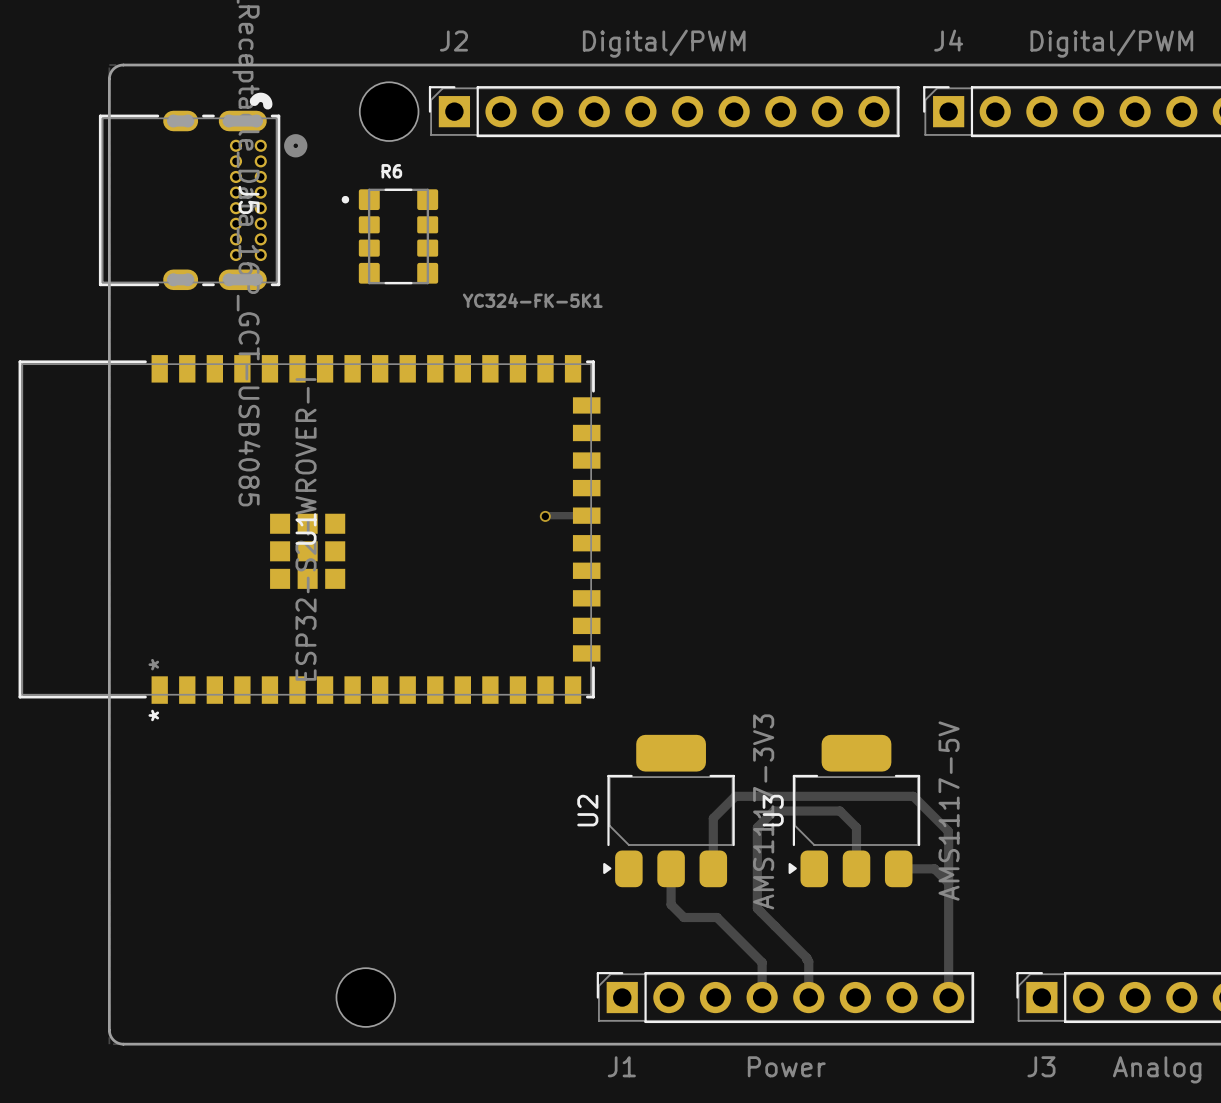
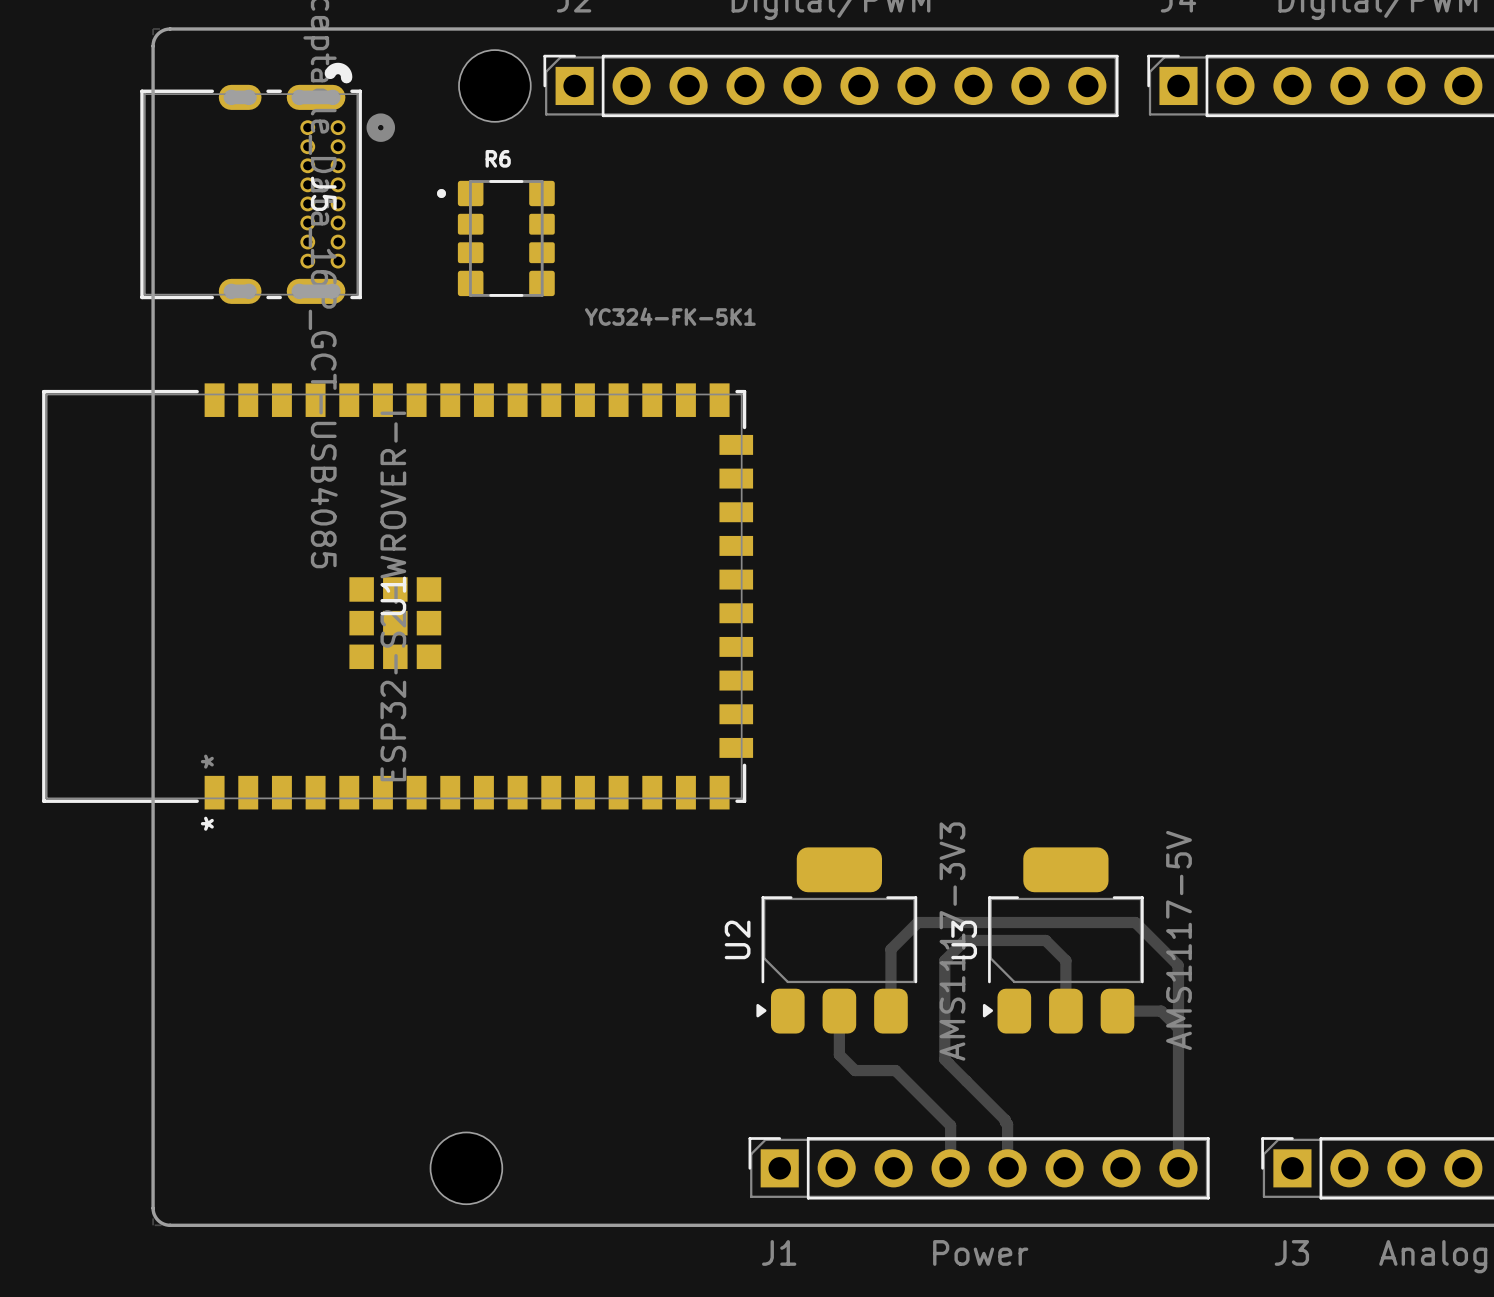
track: (586, 515) (545, 516) -> none
via: (545, 516) -> none

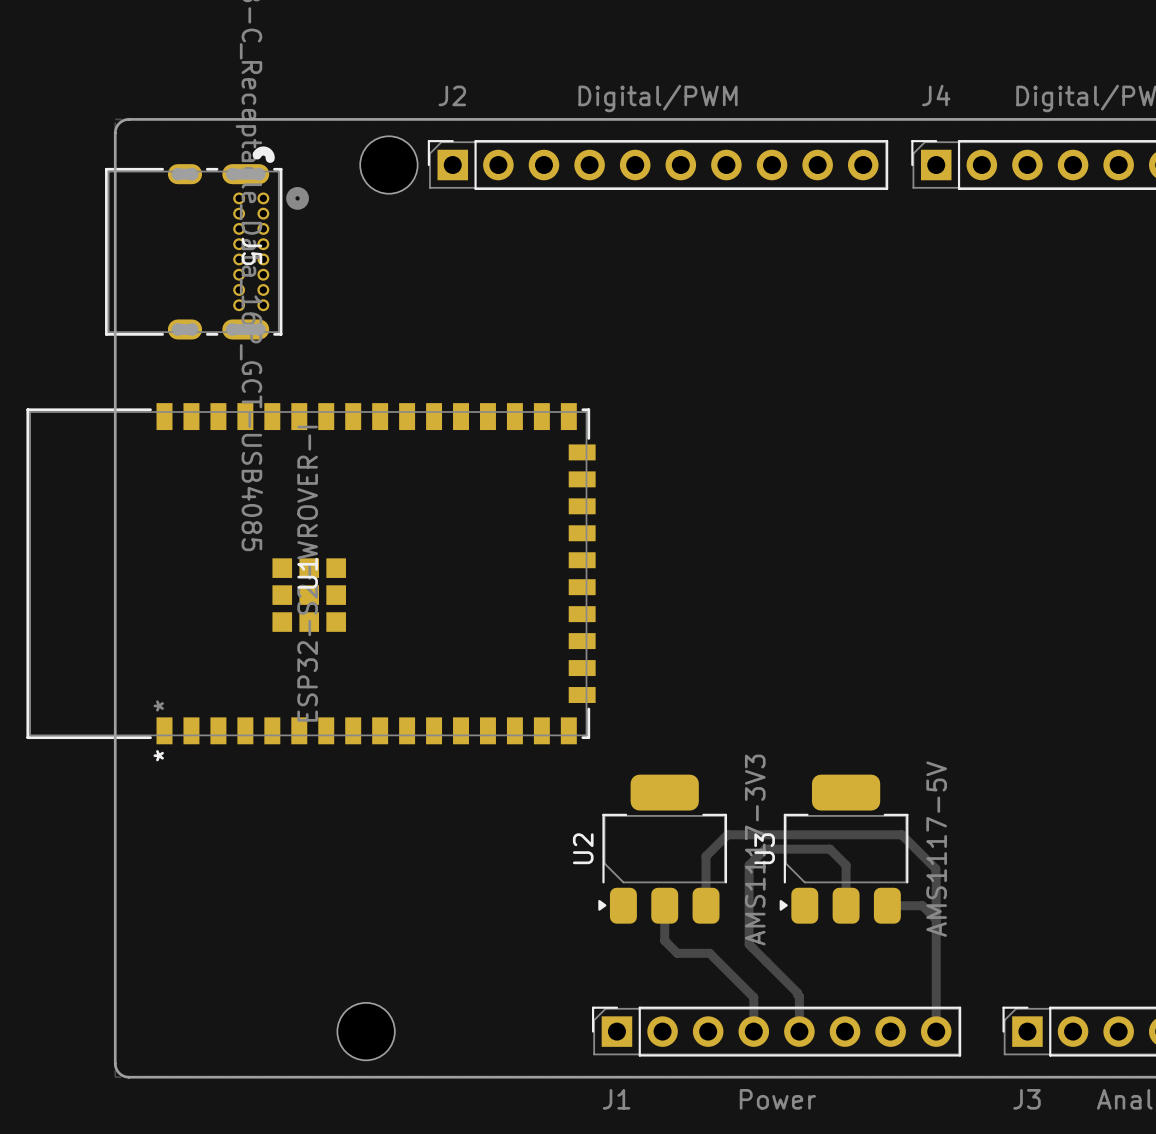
R6: YC324-FK-5K1 (495, 238) -> none

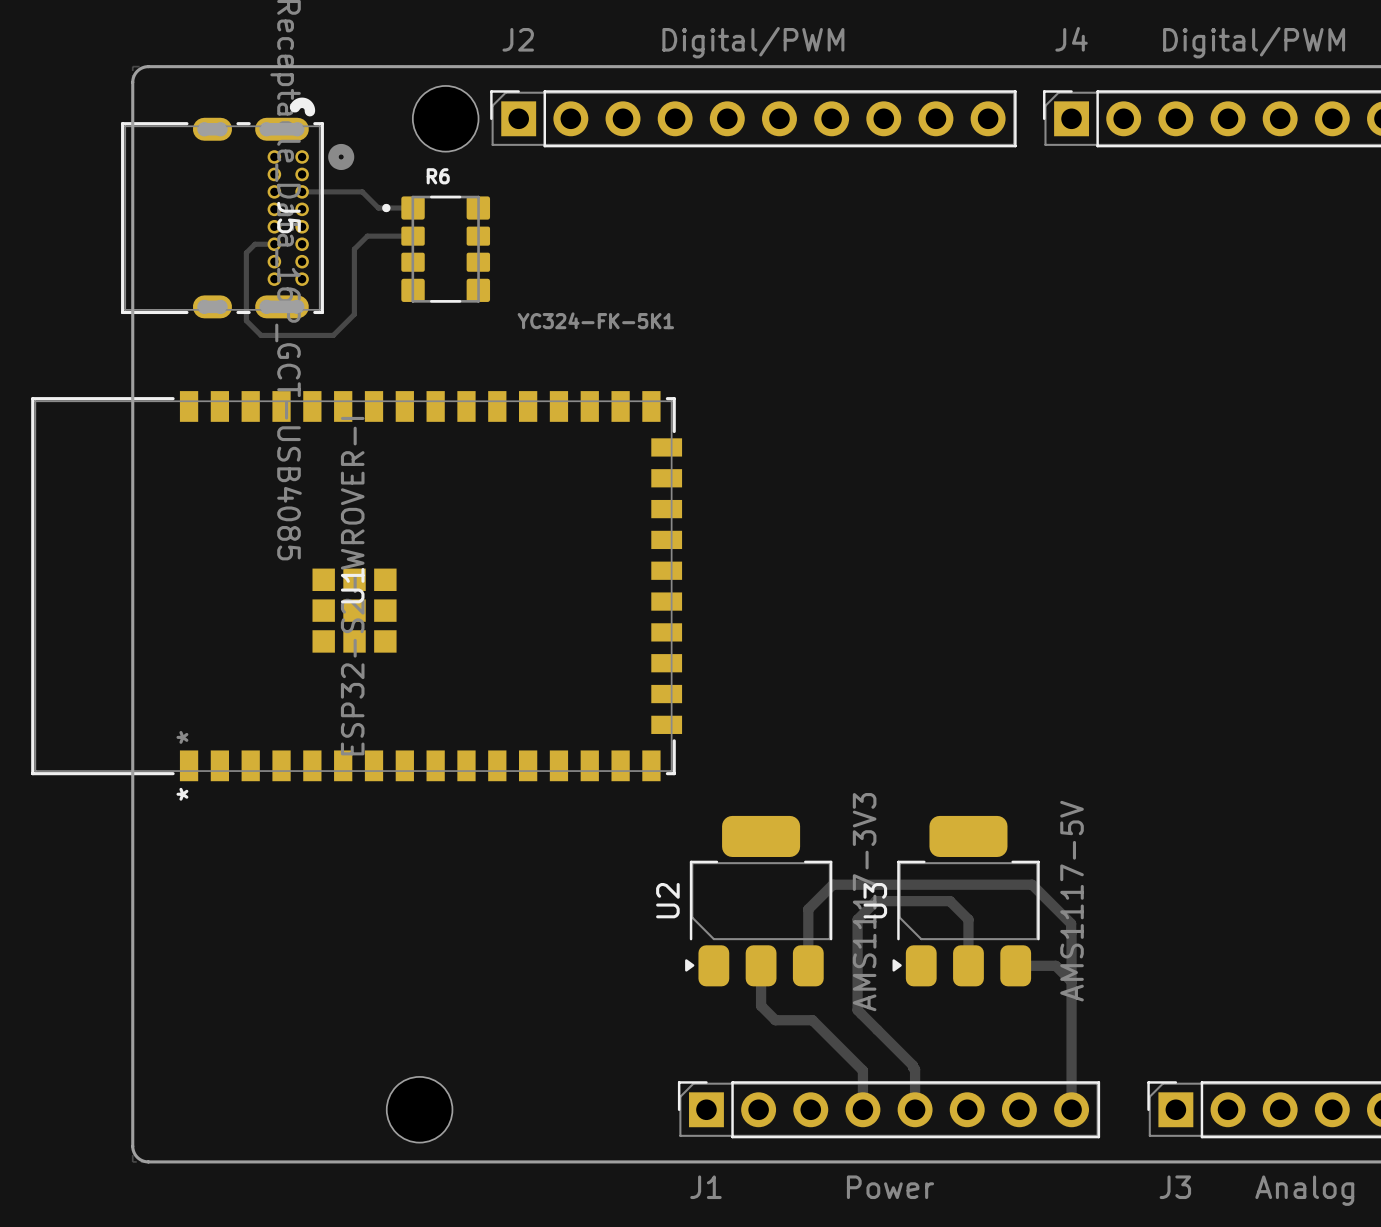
track: none -> (302, 191) (362, 191) (378, 208) (413, 208)
track: none -> (413, 236) (367, 236) (354, 249) (354, 314) (333, 335) (261, 335) (246, 320) (246, 252) (255, 244) (274, 244)
R6: none -> YC324-FK-5K1 (436, 249)

